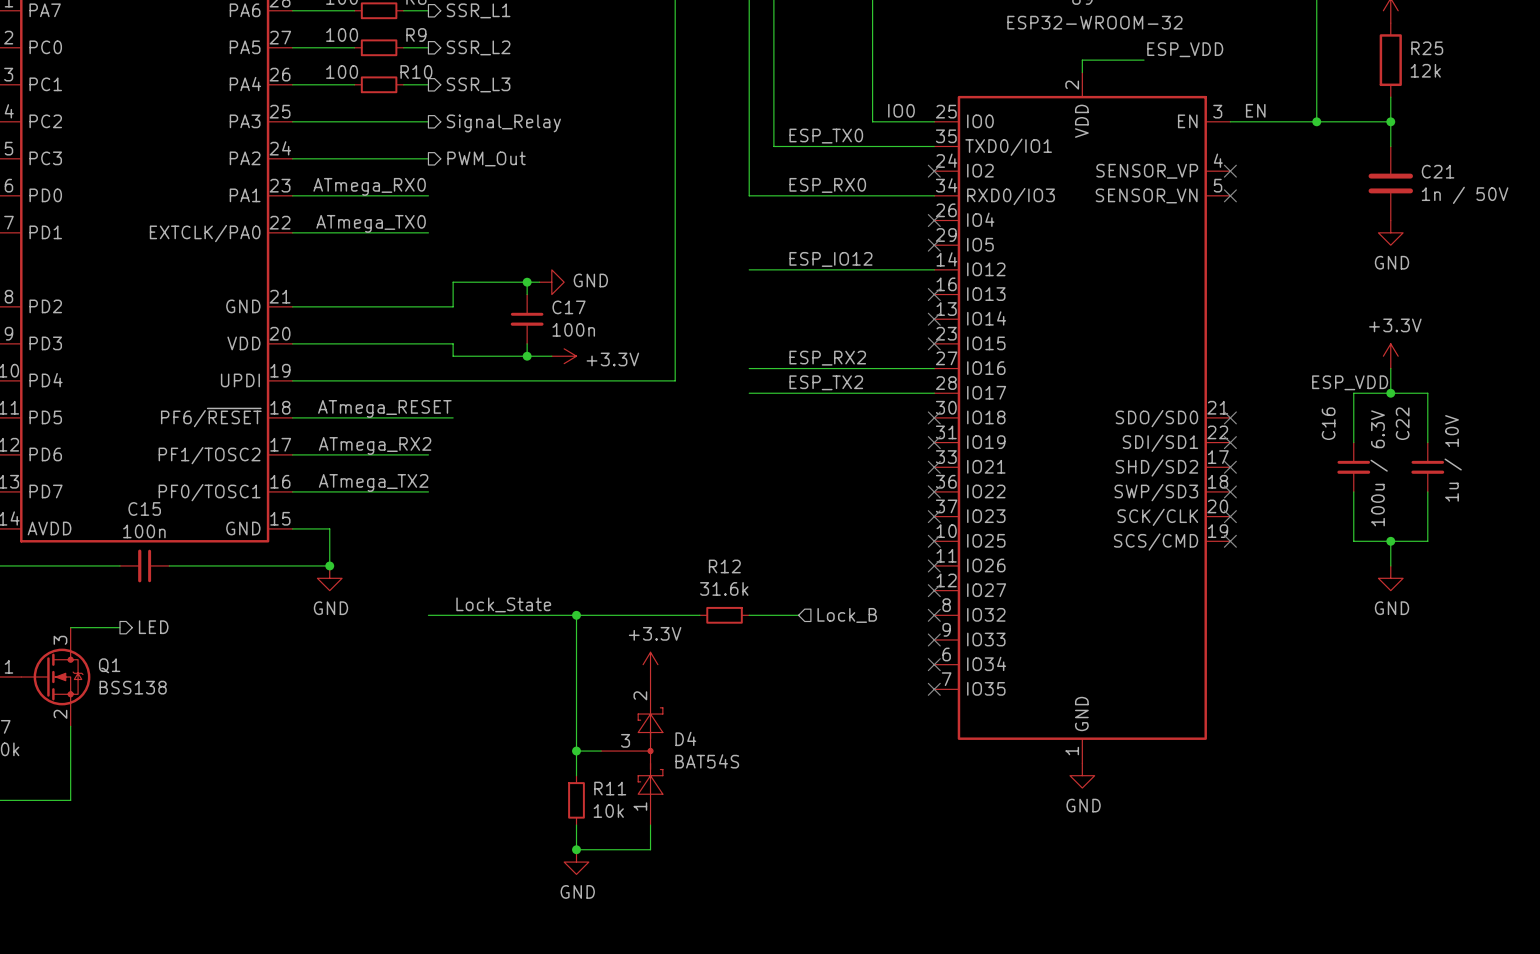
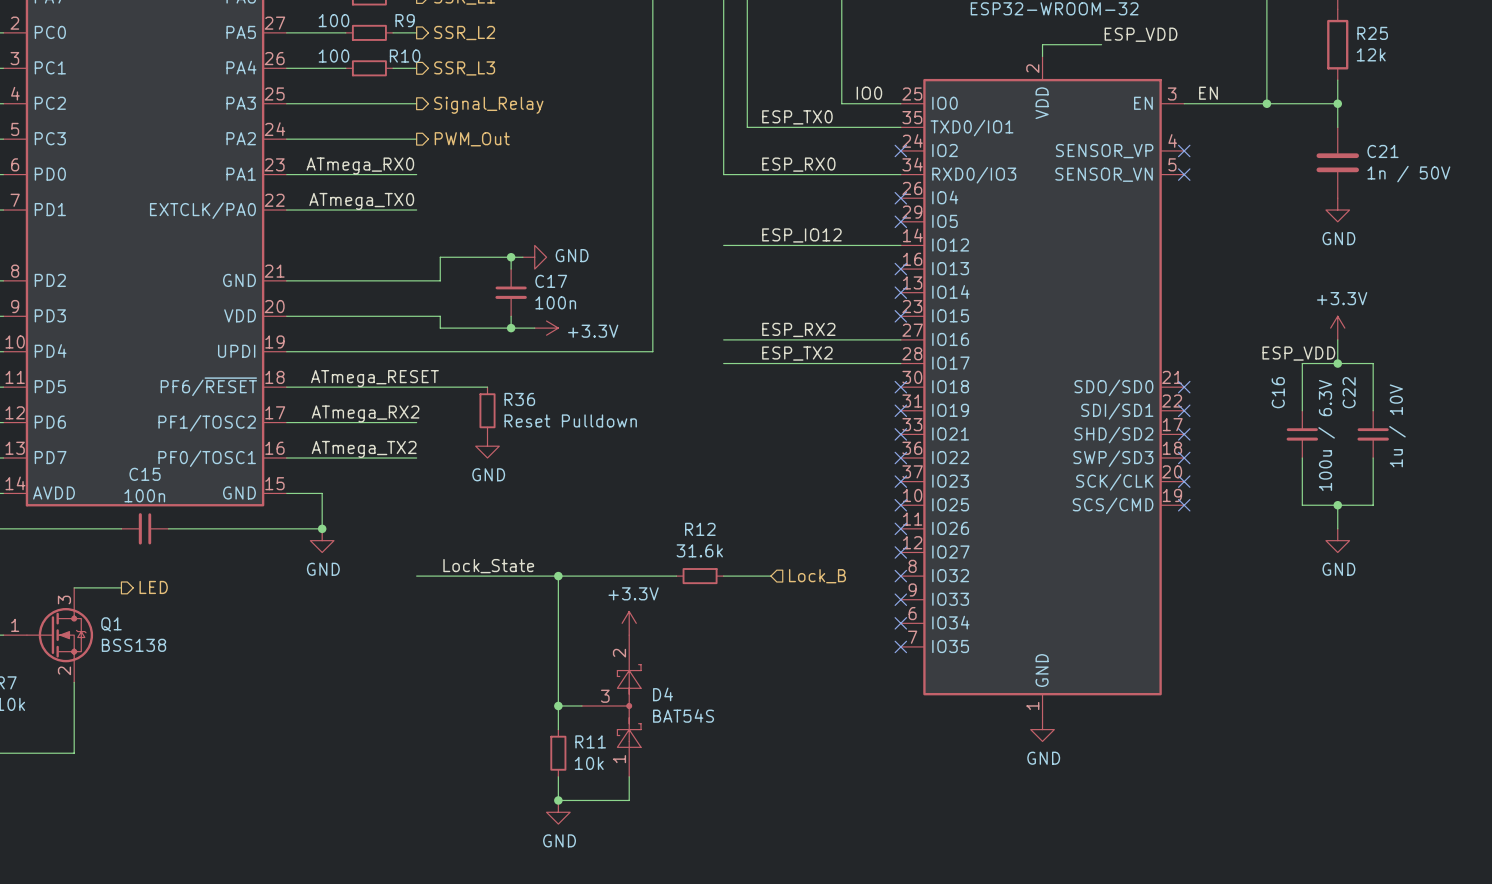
wire: none -> (440, 387) (487, 387)
R36: none -> Reset Pulldown (487, 410)
power symbol: none -> GND (487, 446)

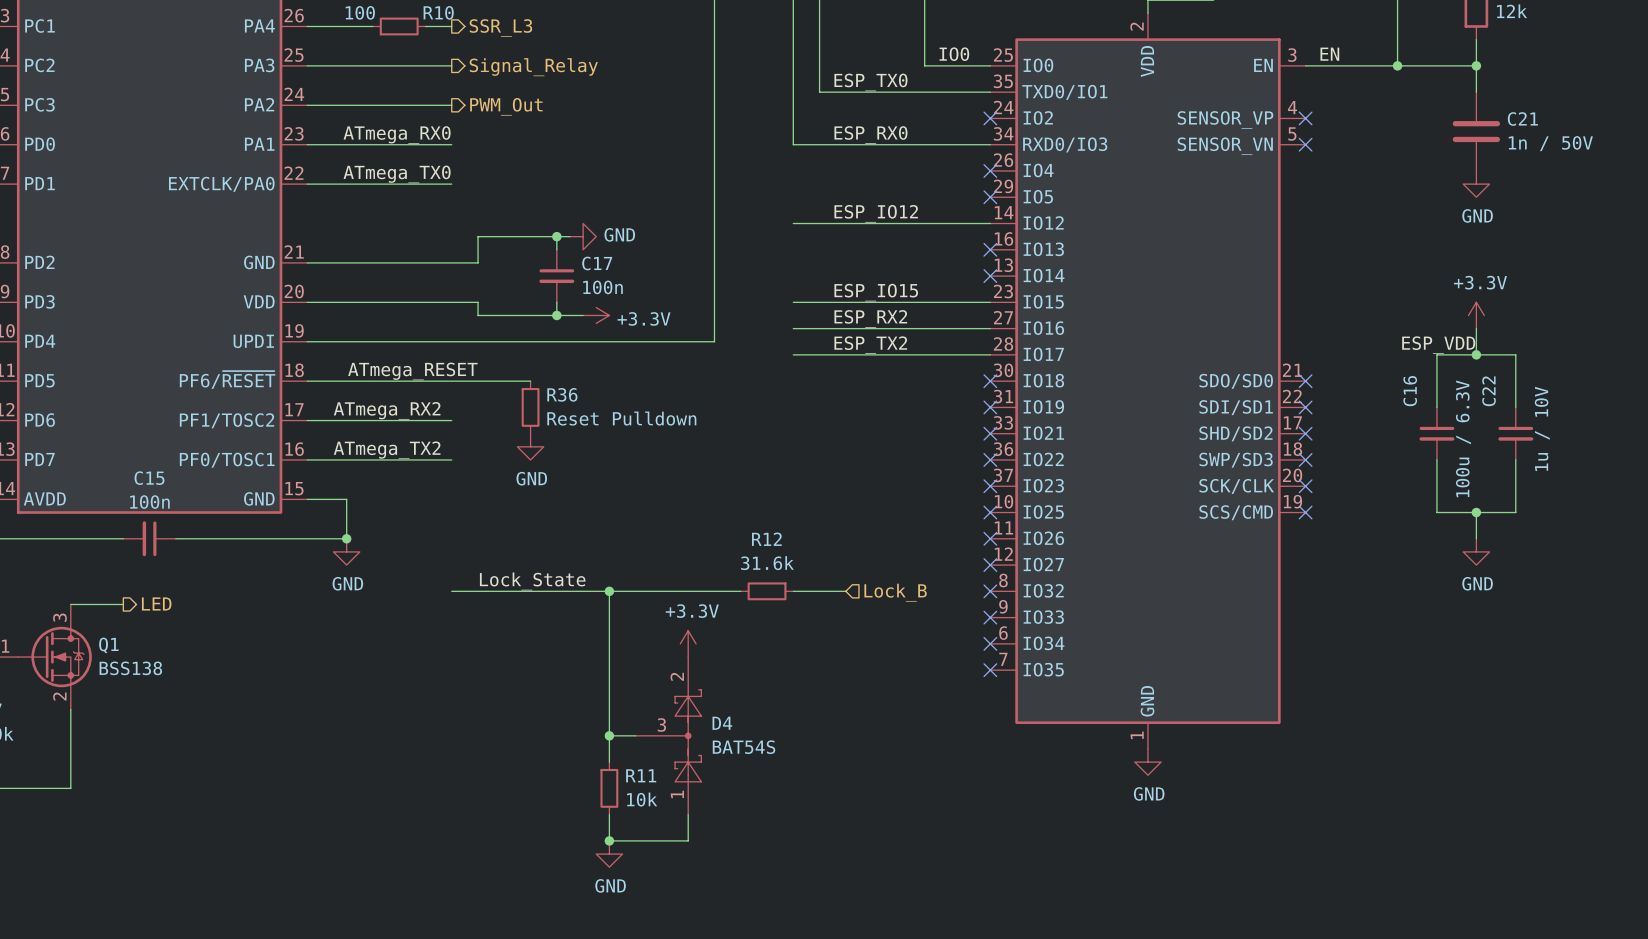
label: none -> ESP_IO15 (876, 292)
wire: none -> (793, 302) (990, 302)
no-connect mark: (900, 316) -> none

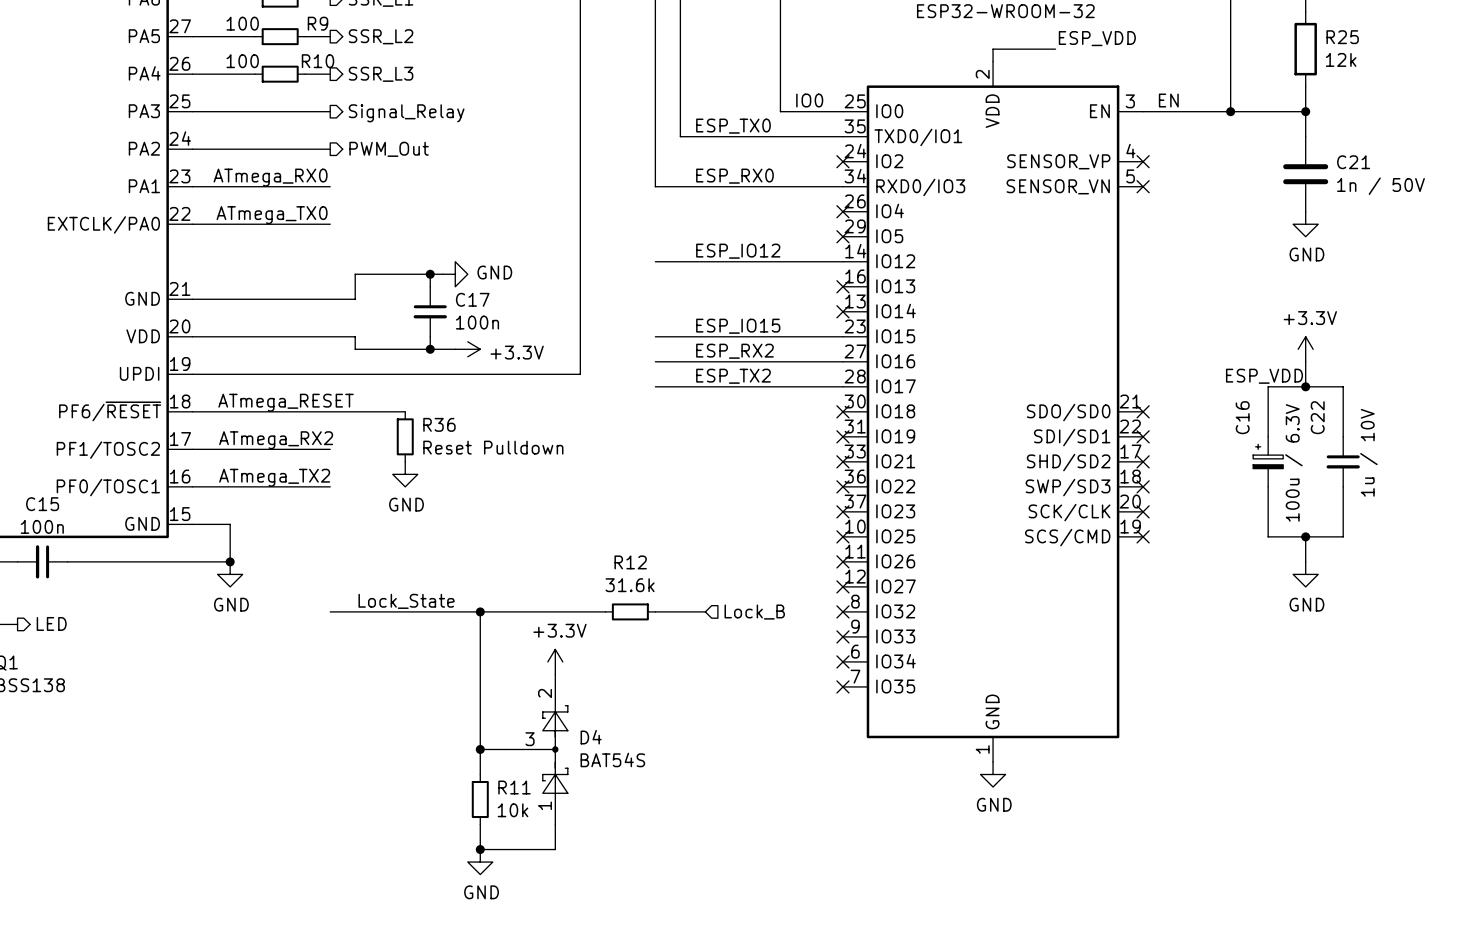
C16 symbol: [1419, 407, 1455, 460] -> [1253, 436, 1284, 487]

